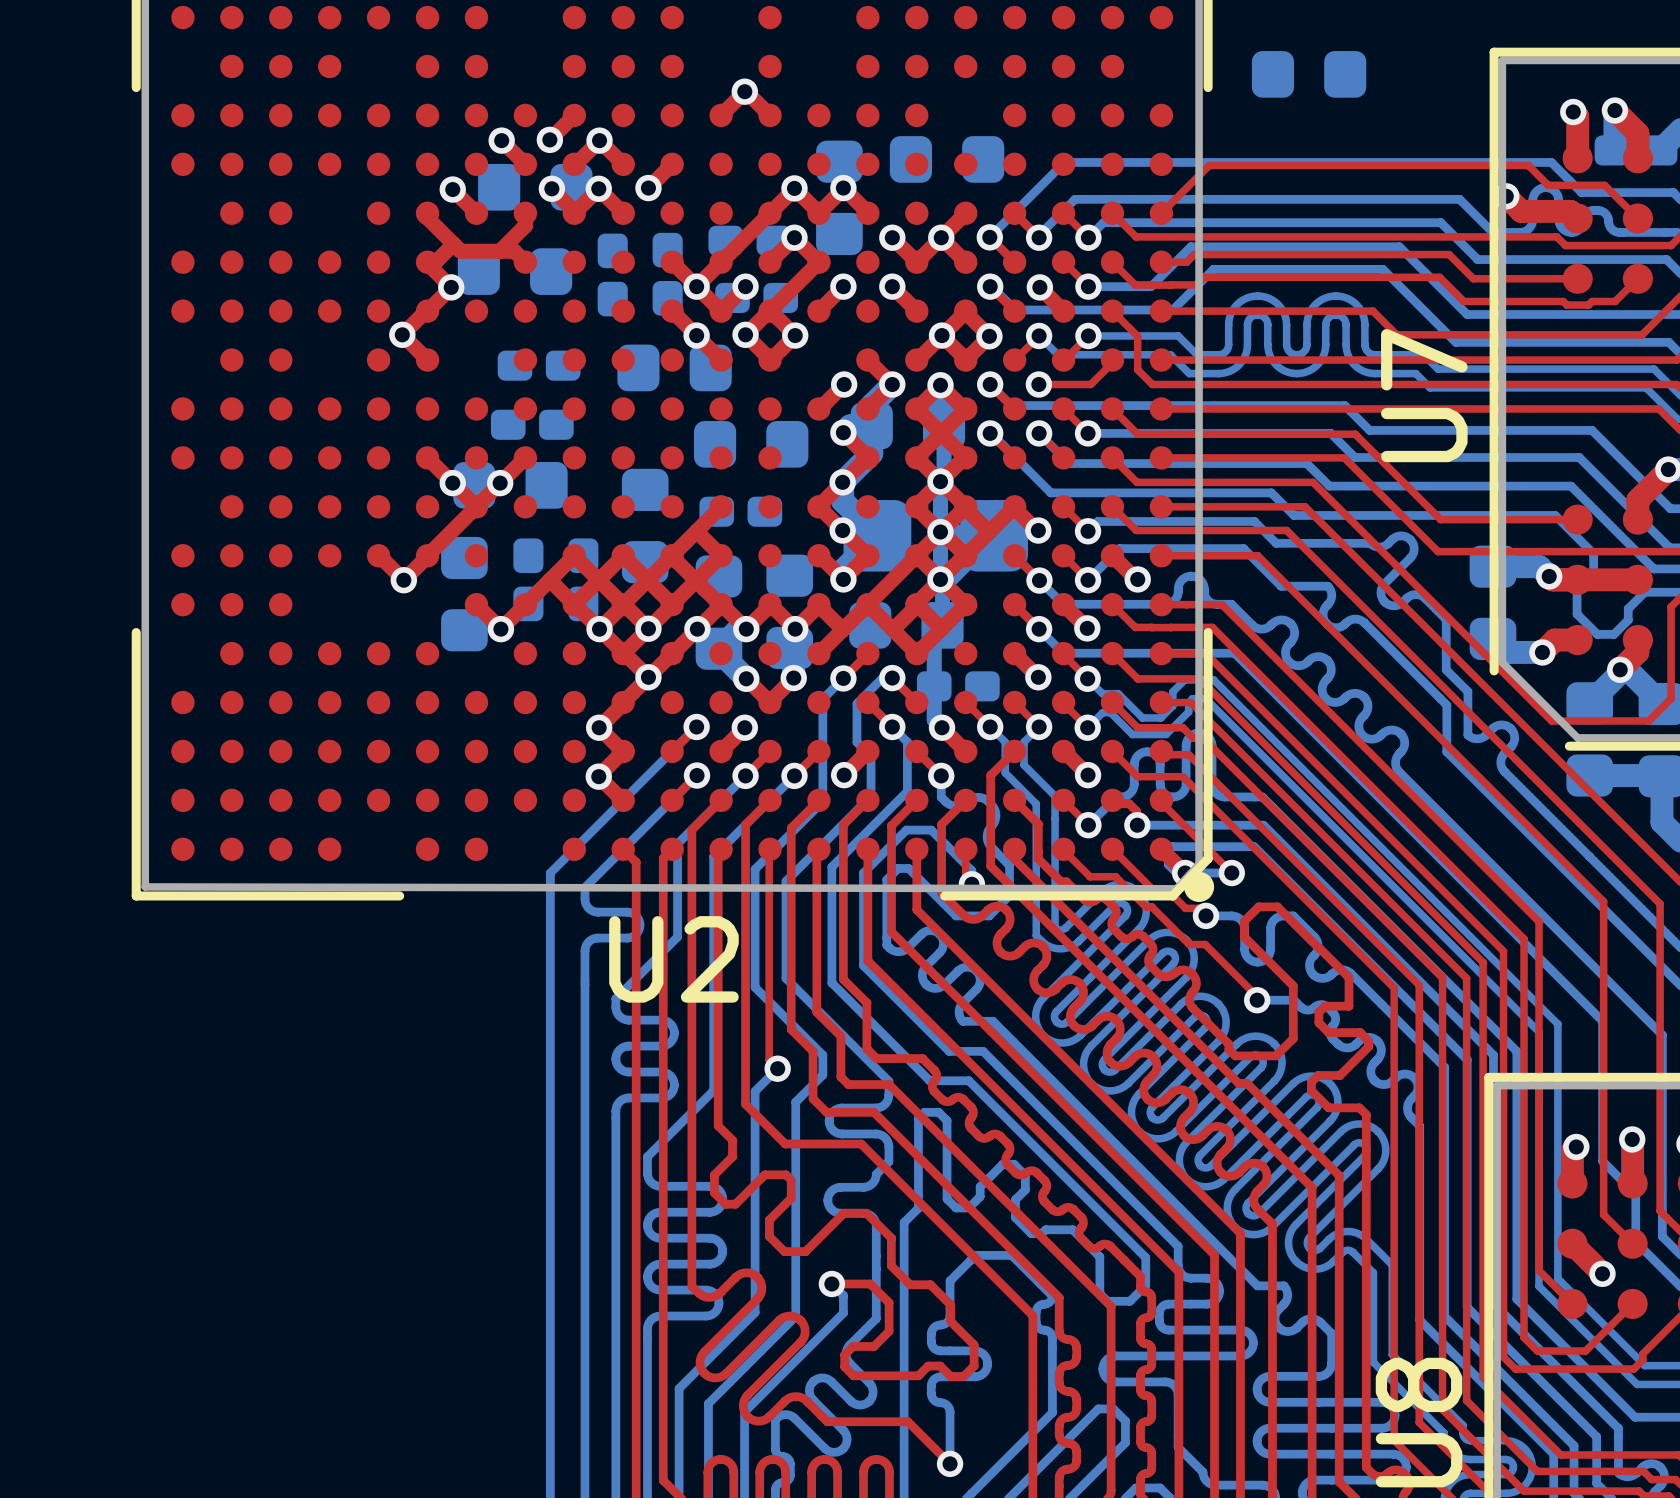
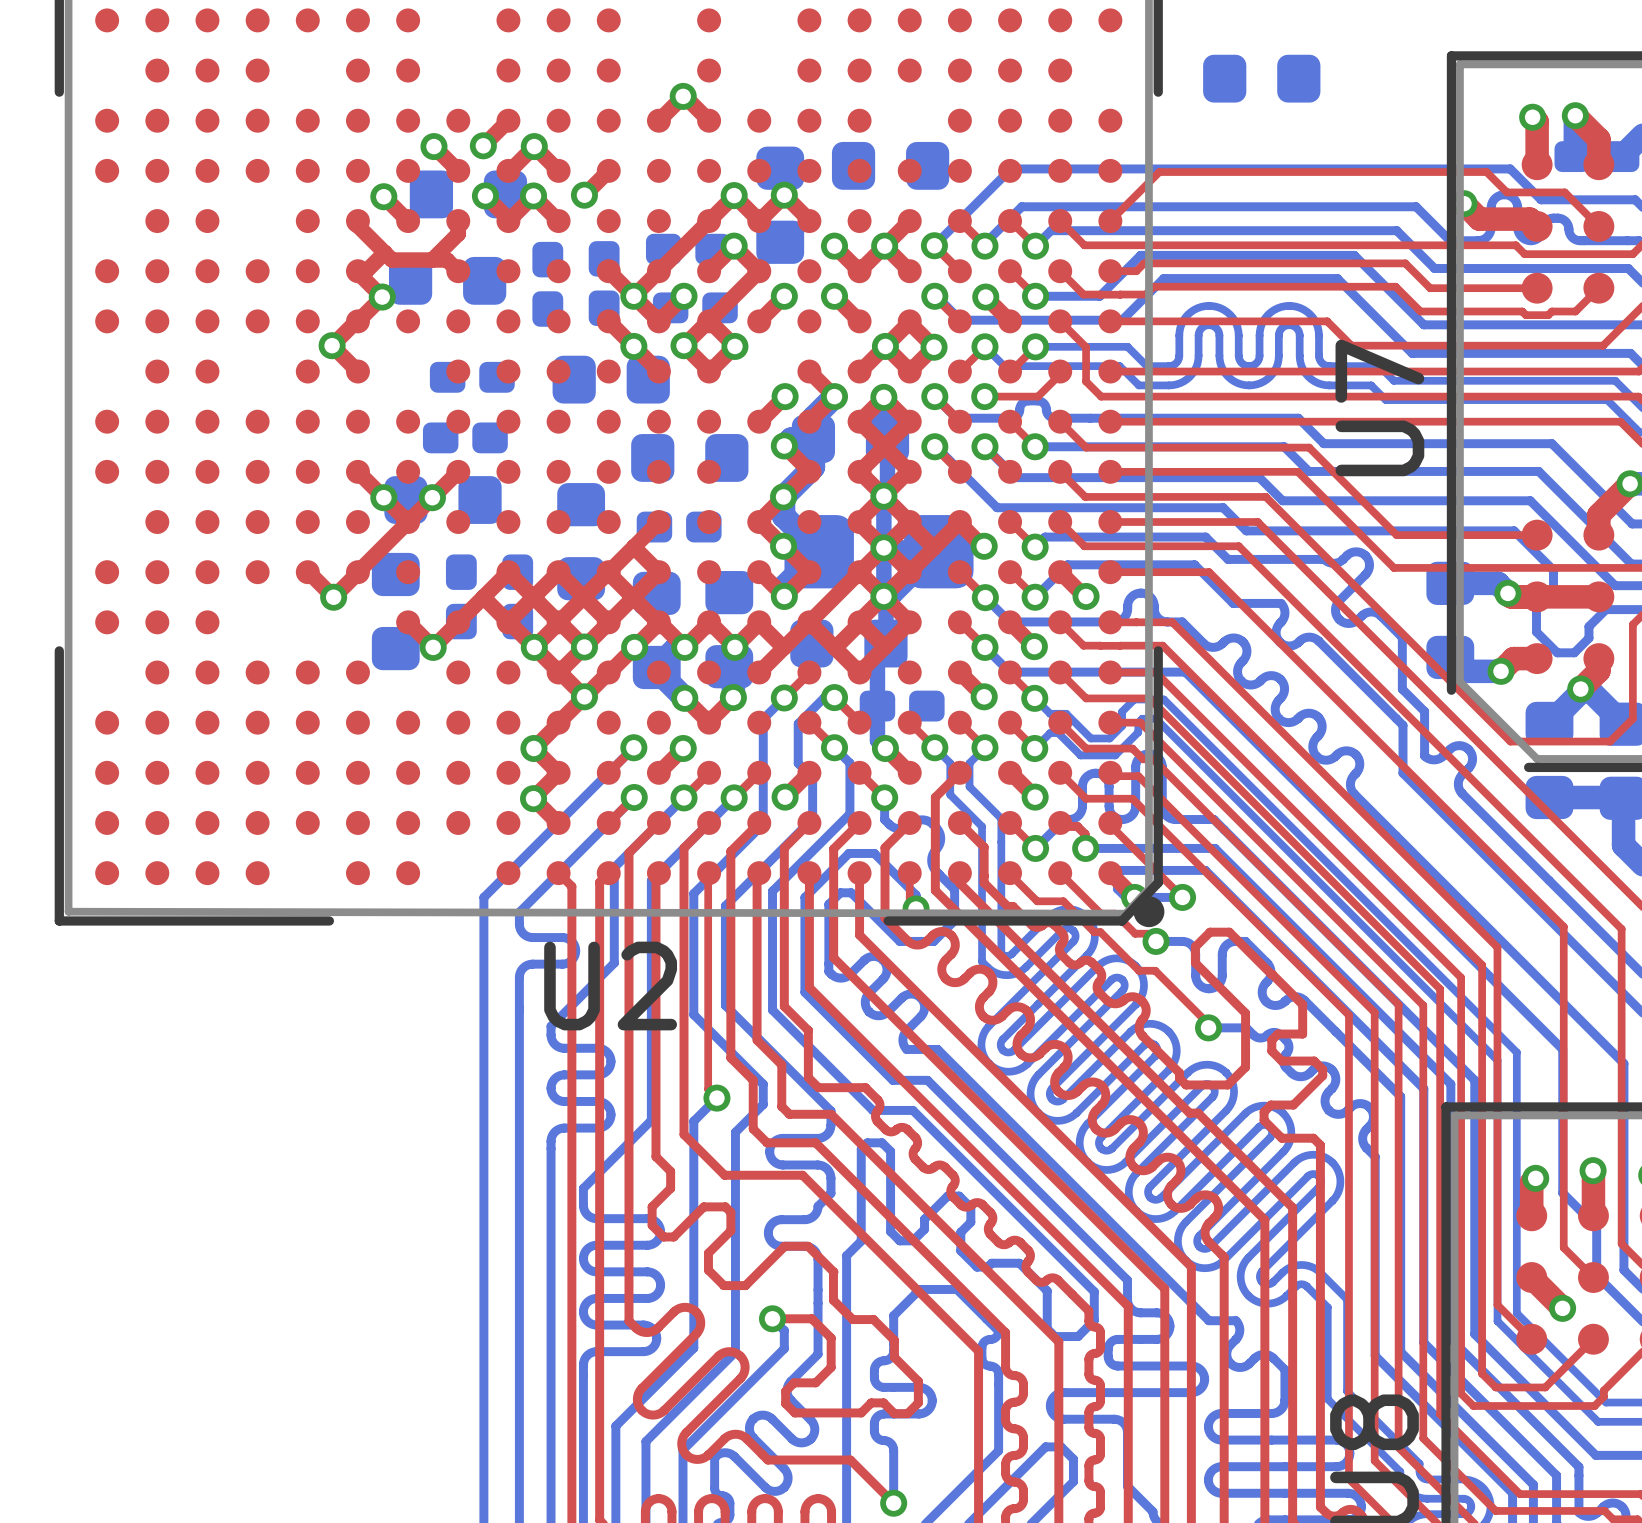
bottom track: (1064, 405) (1107, 405) -> (1011, 418) (1017, 414) (1022, 403) (1028, 400) (1042, 402) (1048, 414) (1055, 418)

